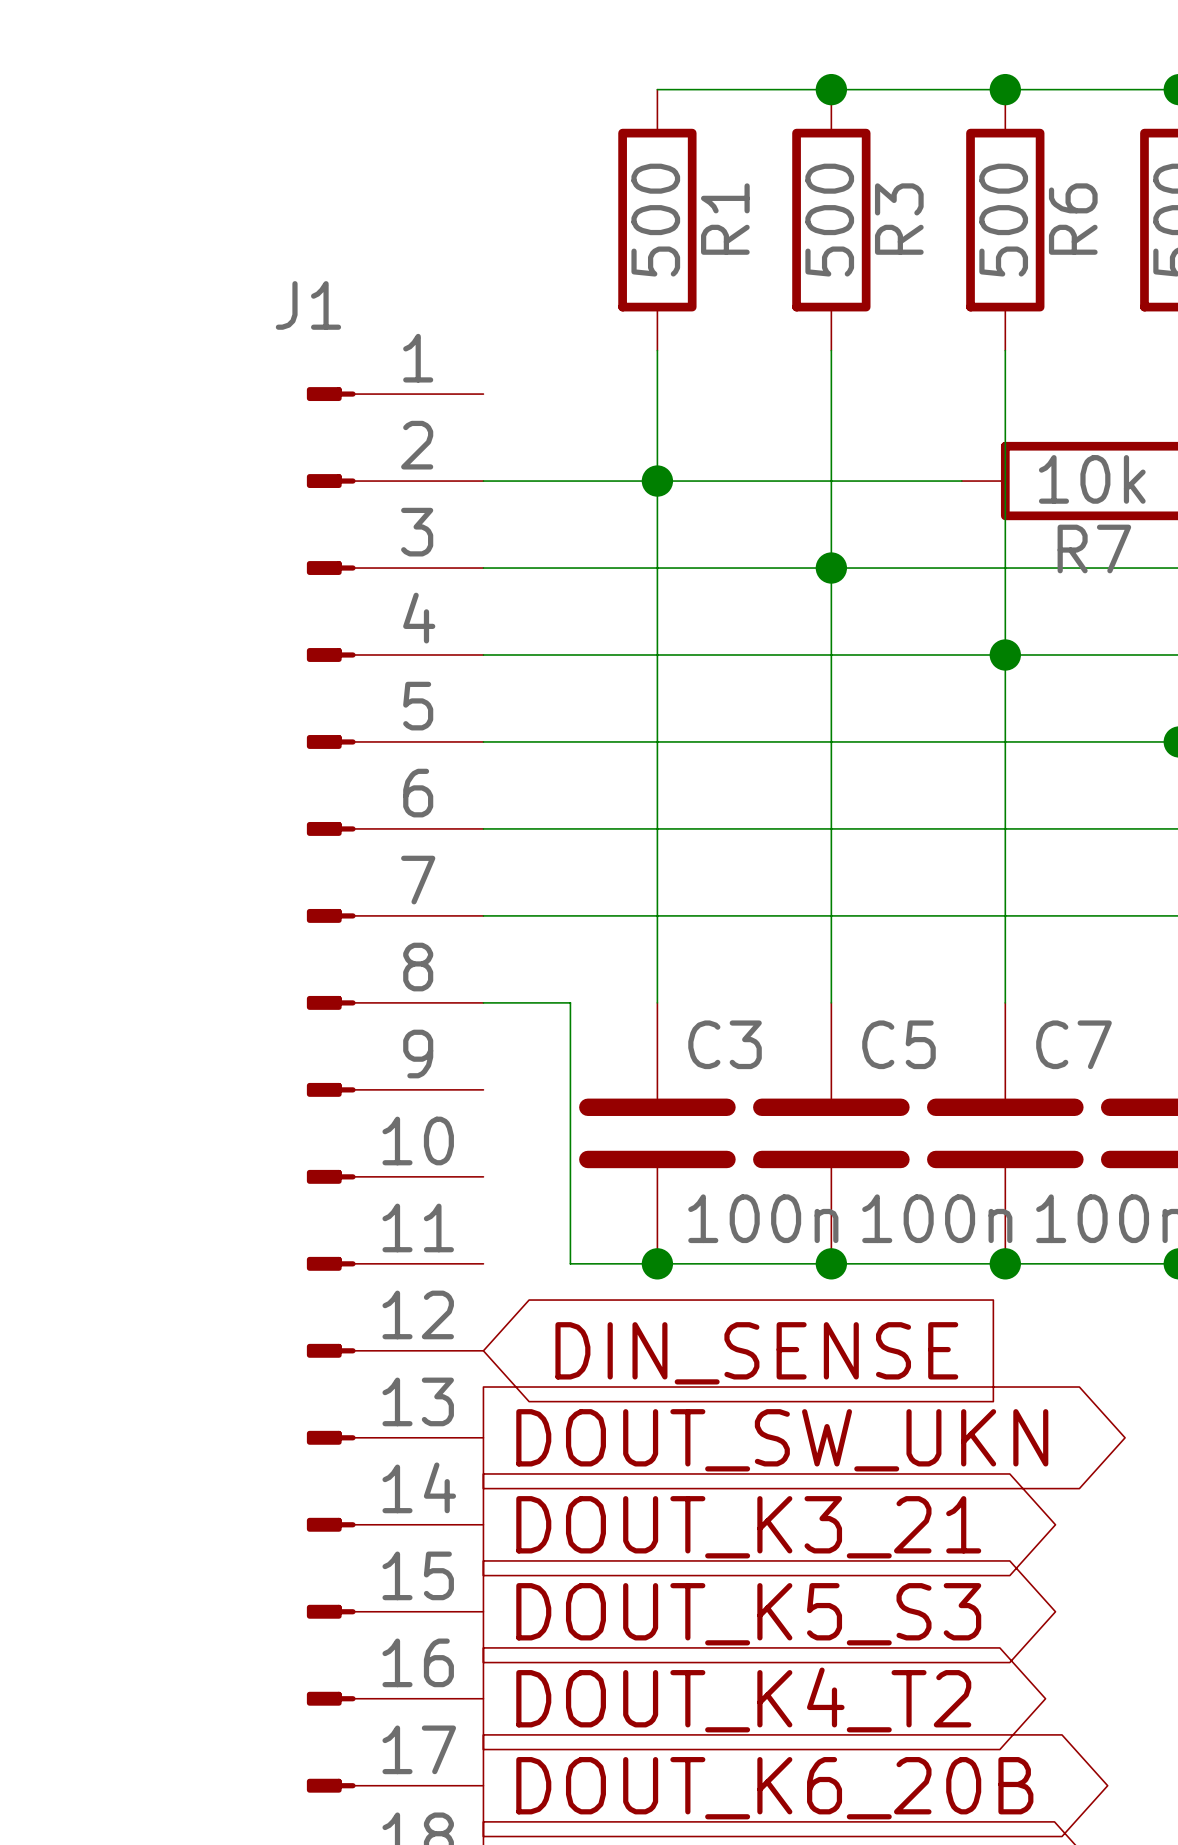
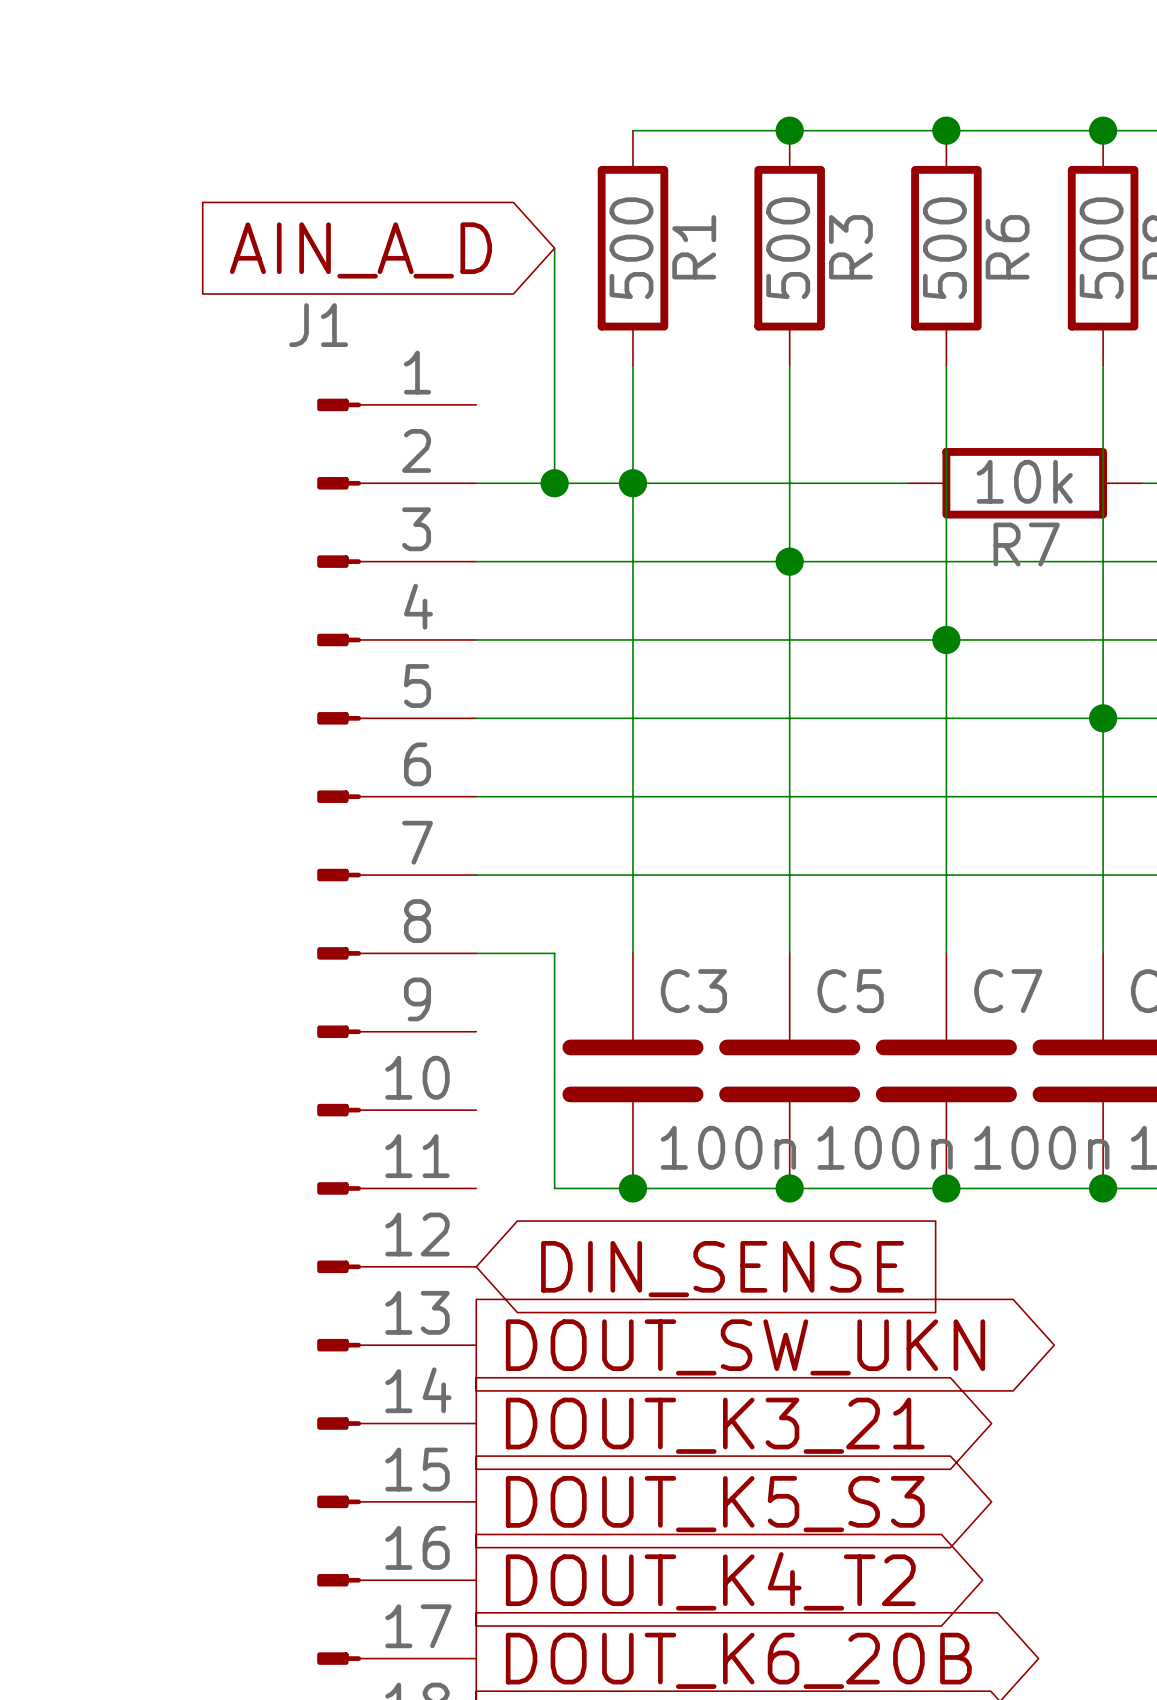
wire: none -> (554, 248) (554, 483)
global label: none -> AIN_A_D (360, 250)
junction: none -> (554, 483)

